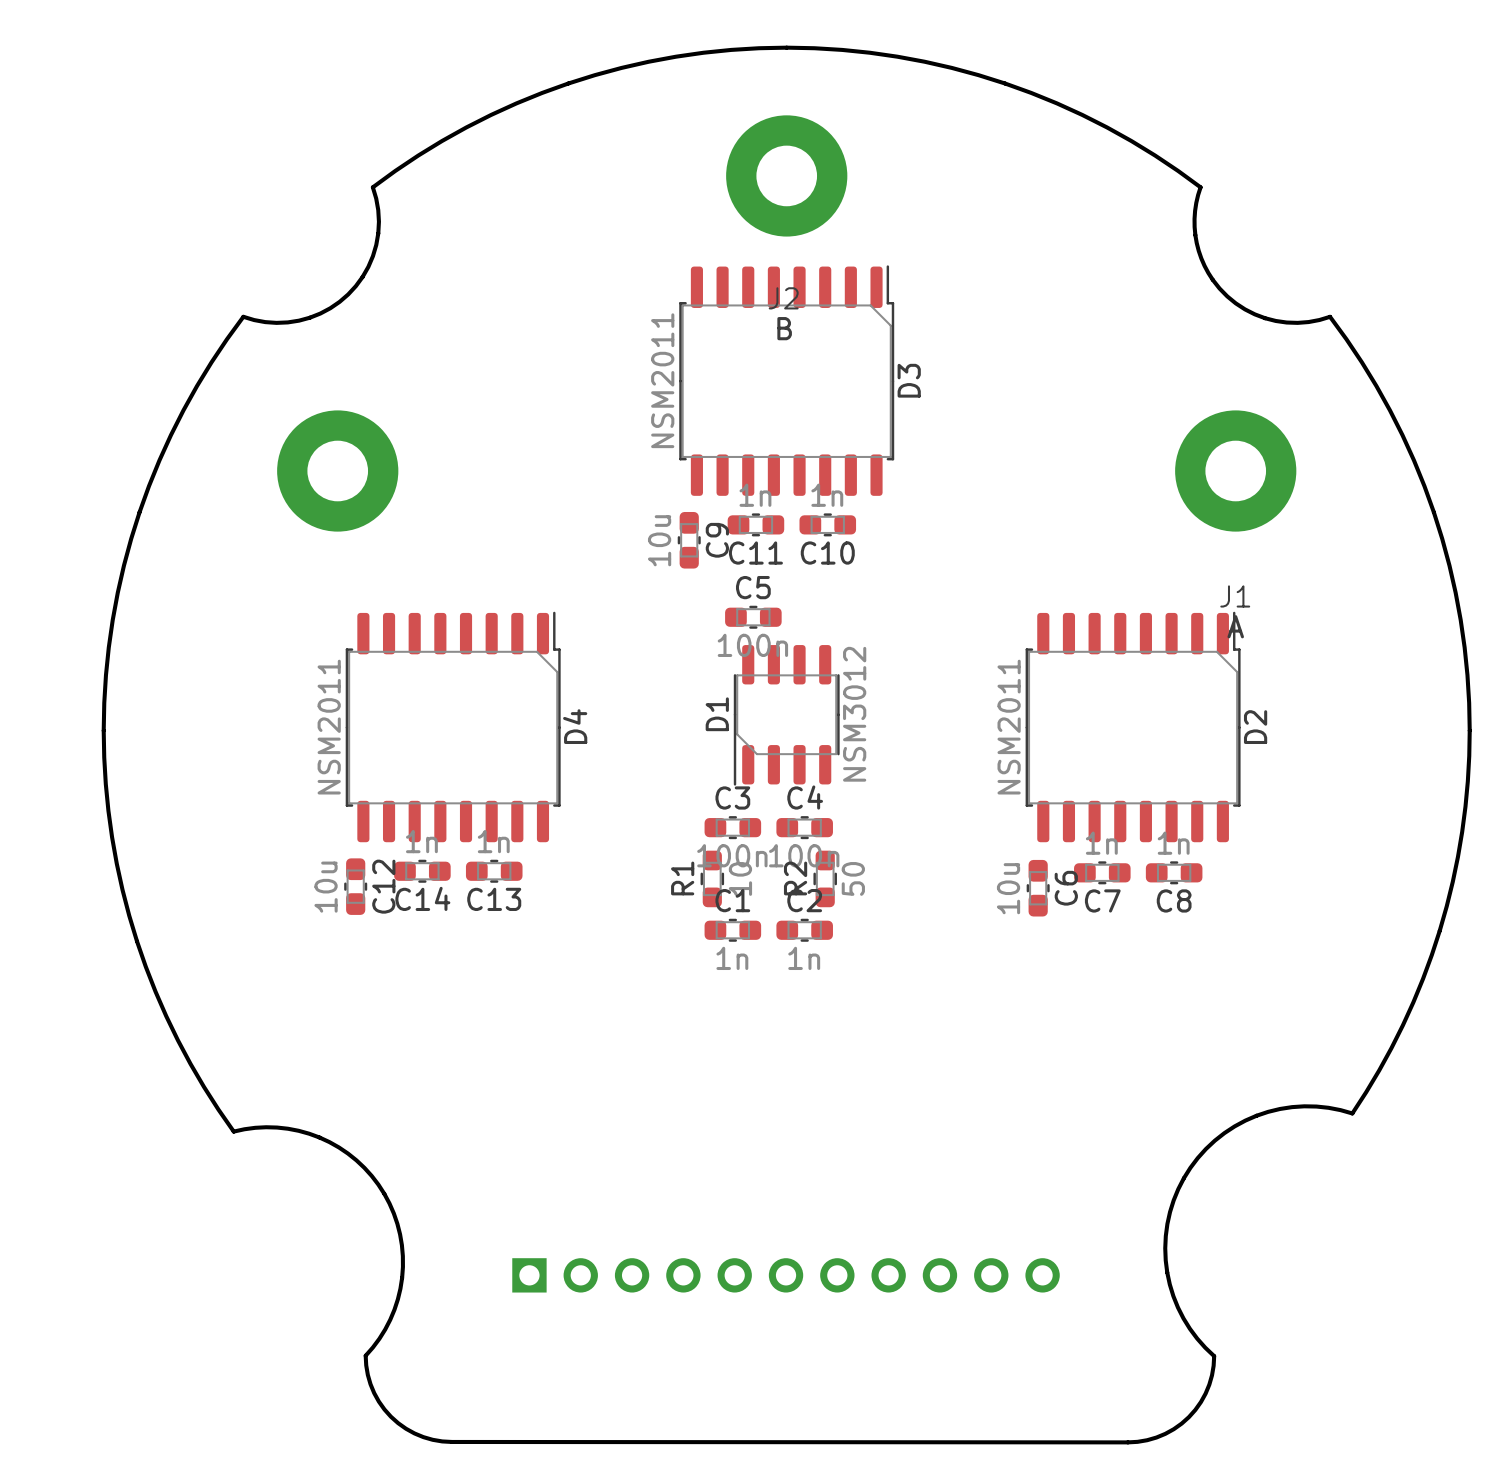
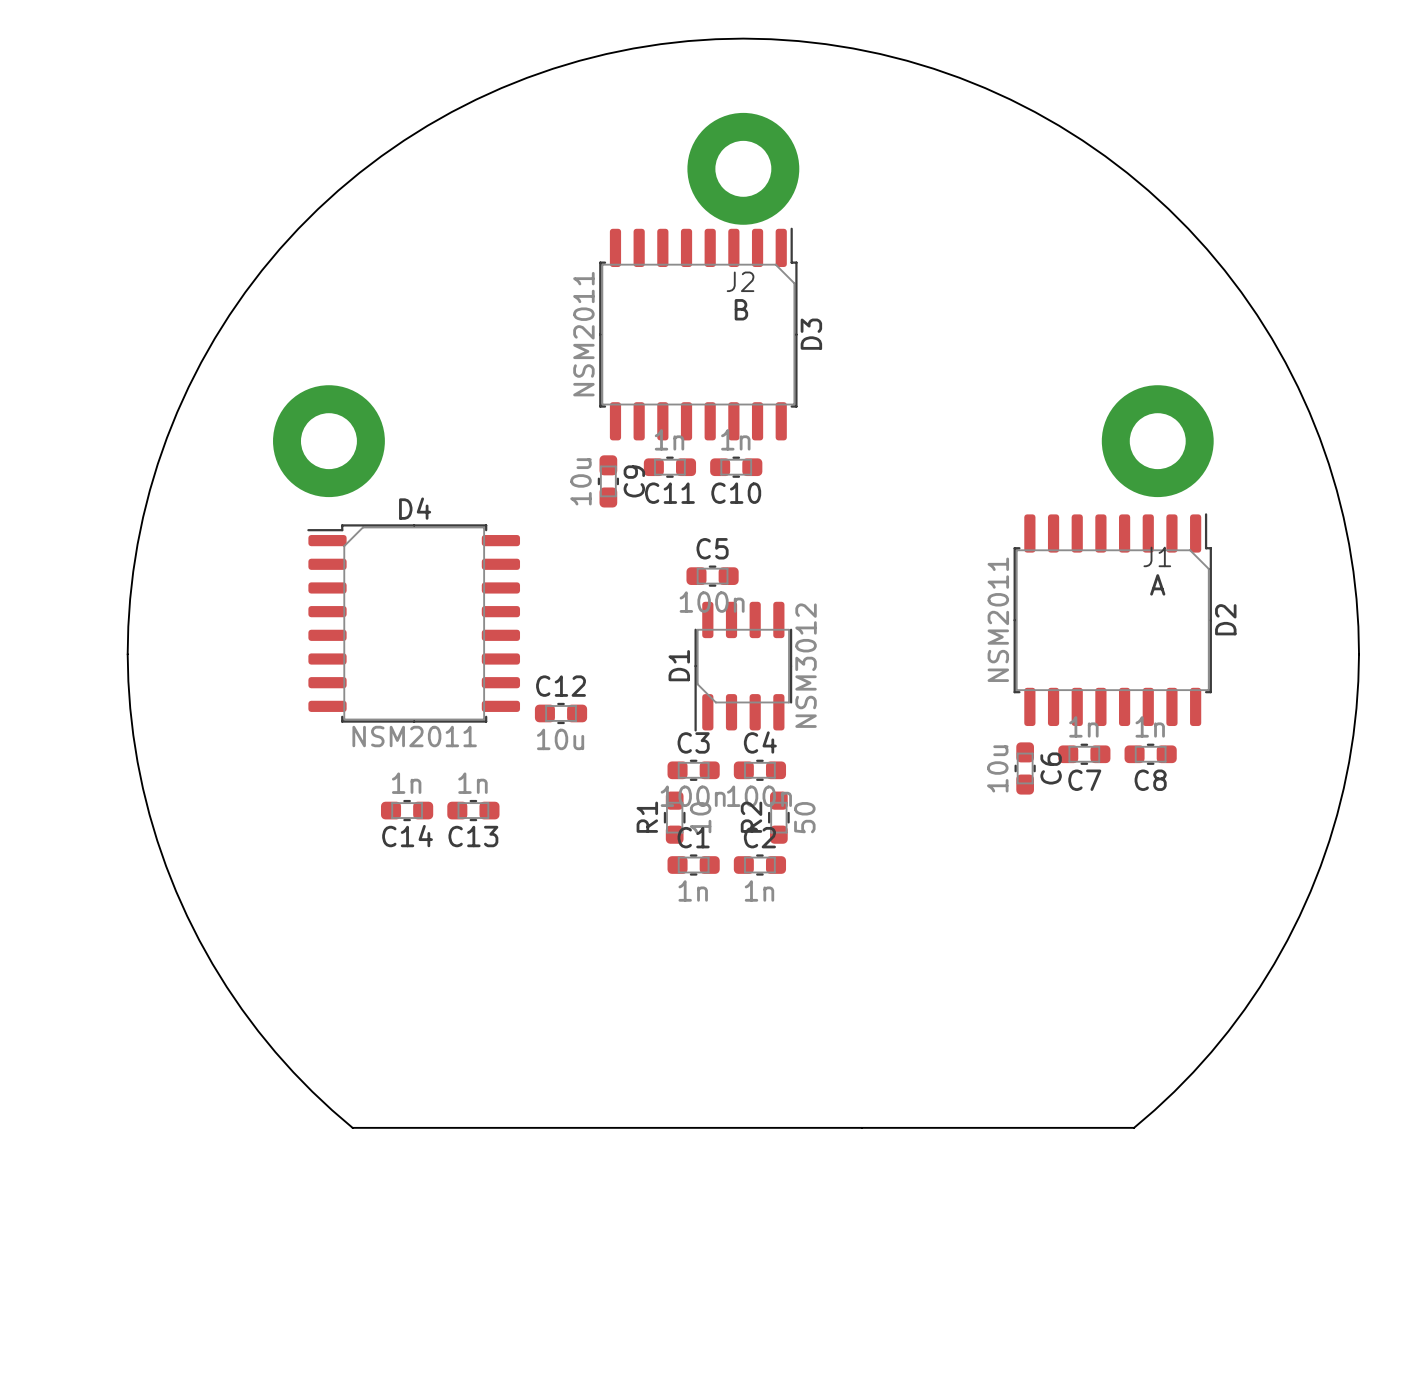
board edge: (786, 47) (703, 52) (648, 61) (568, 83) (491, 114) (442, 140) (372, 187) (378, 221) (376, 244) (362, 277) (339, 301) (320, 313) (287, 322) (265, 322) (243, 316) (197, 386) (170, 435) (139, 512) (117, 592) (105, 675) (103, 730) (108, 810) (122, 889) (145, 966) (166, 1016) (190, 1063) (233, 1131) (255, 1127) (277, 1127) (298, 1130) (319, 1137) (338, 1147) (356, 1160) (371, 1175) (384, 1193) (393, 1213) (400, 1234) (402, 1256) (402, 1277) (394, 1309) (379, 1338) (365, 1355) (366, 1365) (370, 1384) (378, 1401) (390, 1416) (414, 1433) (432, 1439) (451, 1441) (1127, 1442) (1147, 1440) (1173, 1429) (1195, 1409) (1205, 1393) (1213, 1365) (1214, 1356) (1189, 1328) (1177, 1307) (1167, 1272) (1165, 1248) (1167, 1223) (1173, 1200) (1183, 1178) (1197, 1158) (1214, 1140) (1234, 1126) (1256, 1115) (1280, 1108) (1304, 1106) (1328, 1107) (1352, 1113) (1379, 1070) (1402, 1025) (1431, 954) (1446, 906) (1457, 856) (1465, 806) (1469, 756) (1469, 702) (1464, 647) (1449, 565) (1433, 512) (1402, 435) (1361, 362) (1330, 316) (1297, 322) (1265, 318) (1235, 303) (1212, 279) (1201, 258) (1195, 235) (1195, 210) (1200, 187) (1155, 155) (1107, 127) (1057, 103) (1005, 83) (951, 67) (897, 56) (842, 49) (786, 47) -> (127, 654) (130, 599) (137, 544) (149, 490) (166, 437) (188, 387) (214, 338) (245, 292) (298, 228) (359, 172) (404, 140) (451, 112) (501, 88) (553, 68) (606, 54) (688, 41) (743, 38) (798, 41) (853, 48) (907, 60) (985, 88) (1035, 112) (1082, 140) (1127, 172) (1168, 209) (1206, 249) (1257, 315) (1285, 362) (1309, 412) (1328, 464) (1343, 517) (1356, 599) (1359, 654) (1353, 735) (1343, 788) (1329, 840) (1299, 916) (1259, 987) (1228, 1031) (1193, 1072) (1134, 1127) (352, 1127) (312, 1091) (258, 1031) (212, 964) (187, 916) (166, 866) (142, 788) (133, 735) (127, 654)
D3 position: (786, 380) -> (698, 334)
C11 position: (755, 524) -> (669, 467)
C10 position: (827, 524) -> (736, 467)
C9 position: (689, 540) -> (608, 481)
D4 rotation: 0° (453, 726) -> 90° counterclockwise (413, 623)
D2 position: (1133, 726) -> (1112, 619)
C7 position: (1102, 872) -> (1084, 754)
C8 position: (1174, 872) -> (1150, 754)
C12 rotation: 0° (355, 886) -> 90° clockwise (561, 713)
C12 position: (355, 886) -> (561, 713)
C12 name position: C12 (383, 886) -> C12 (561, 686)
C12 value position: 10u (326, 887) -> 10u (560, 739)
C6 position: (1038, 888) -> (1025, 768)
part: (786, 1275) -> none

